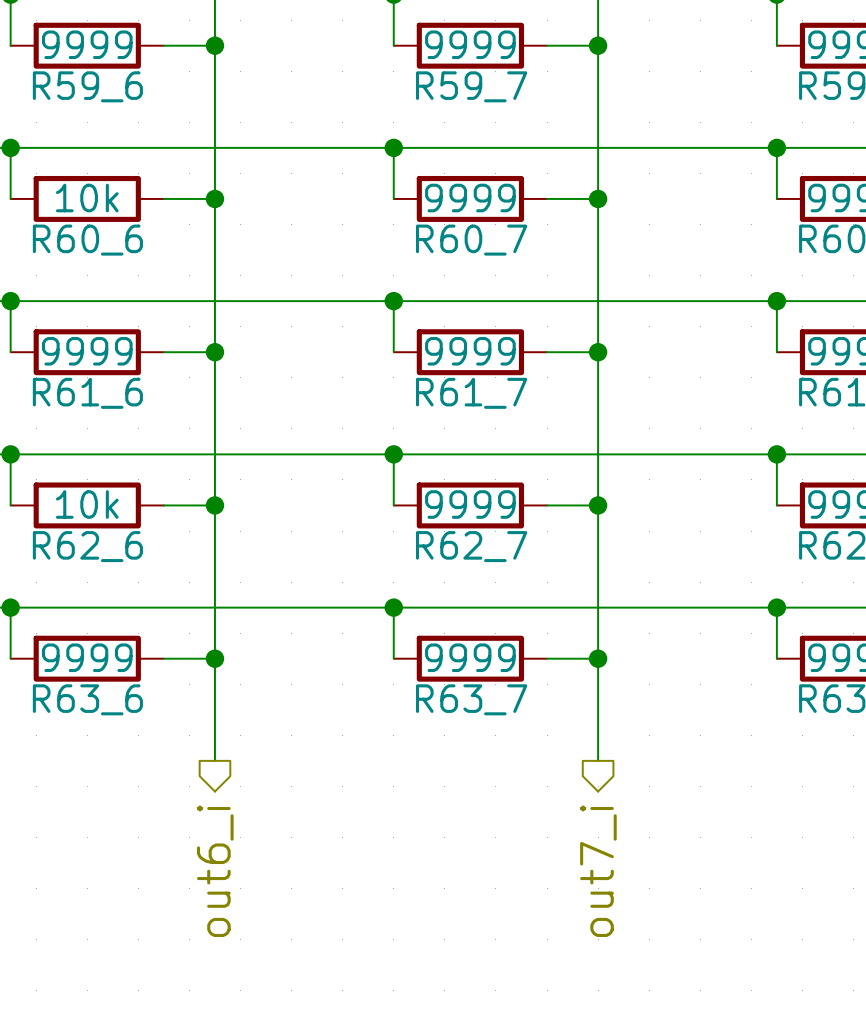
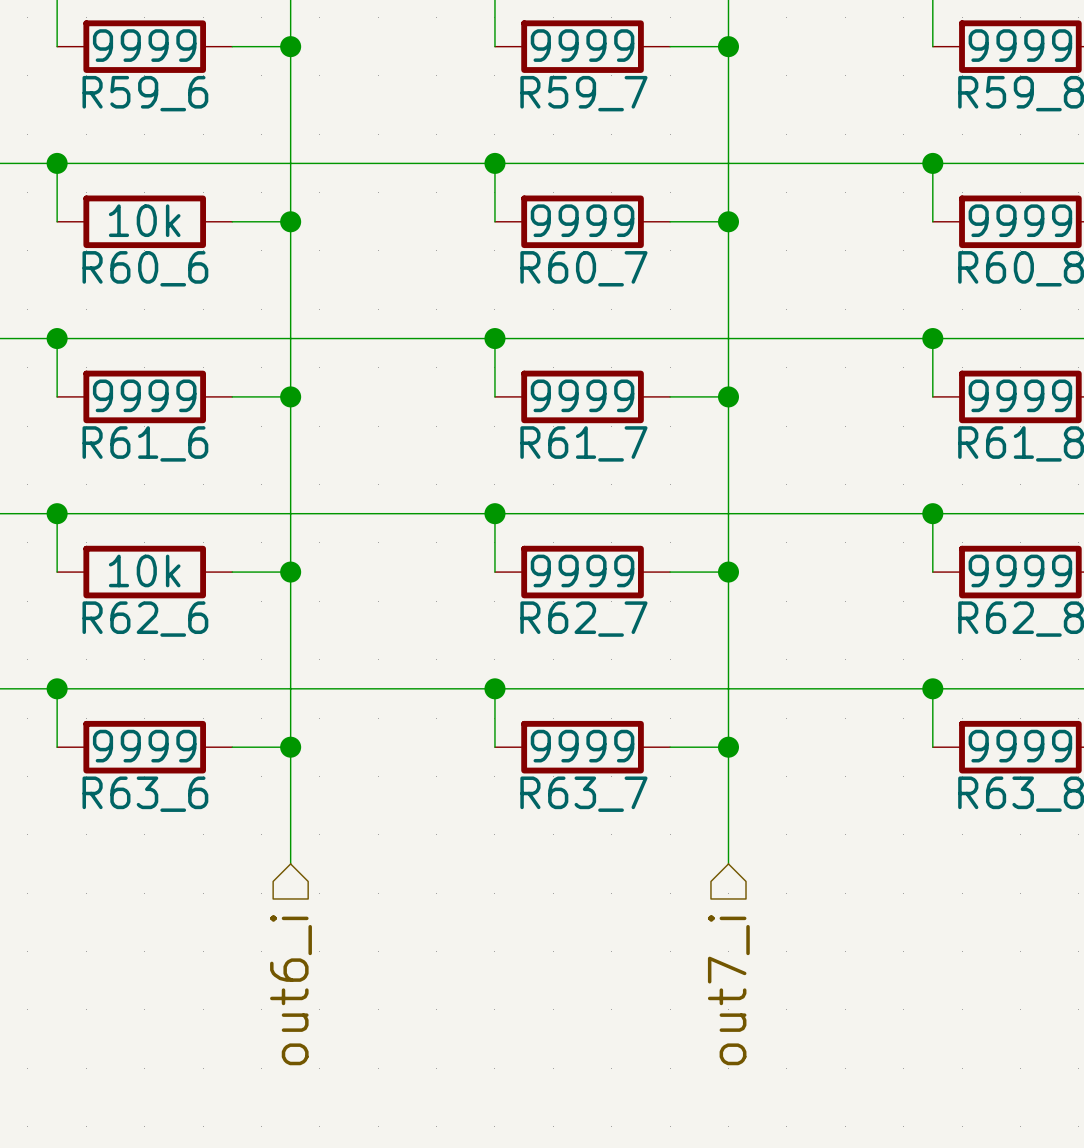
hierarchical label shape: output (215, 871) -> input (291, 990)
hierarchical label shape: output (598, 871) -> input (728, 990)

